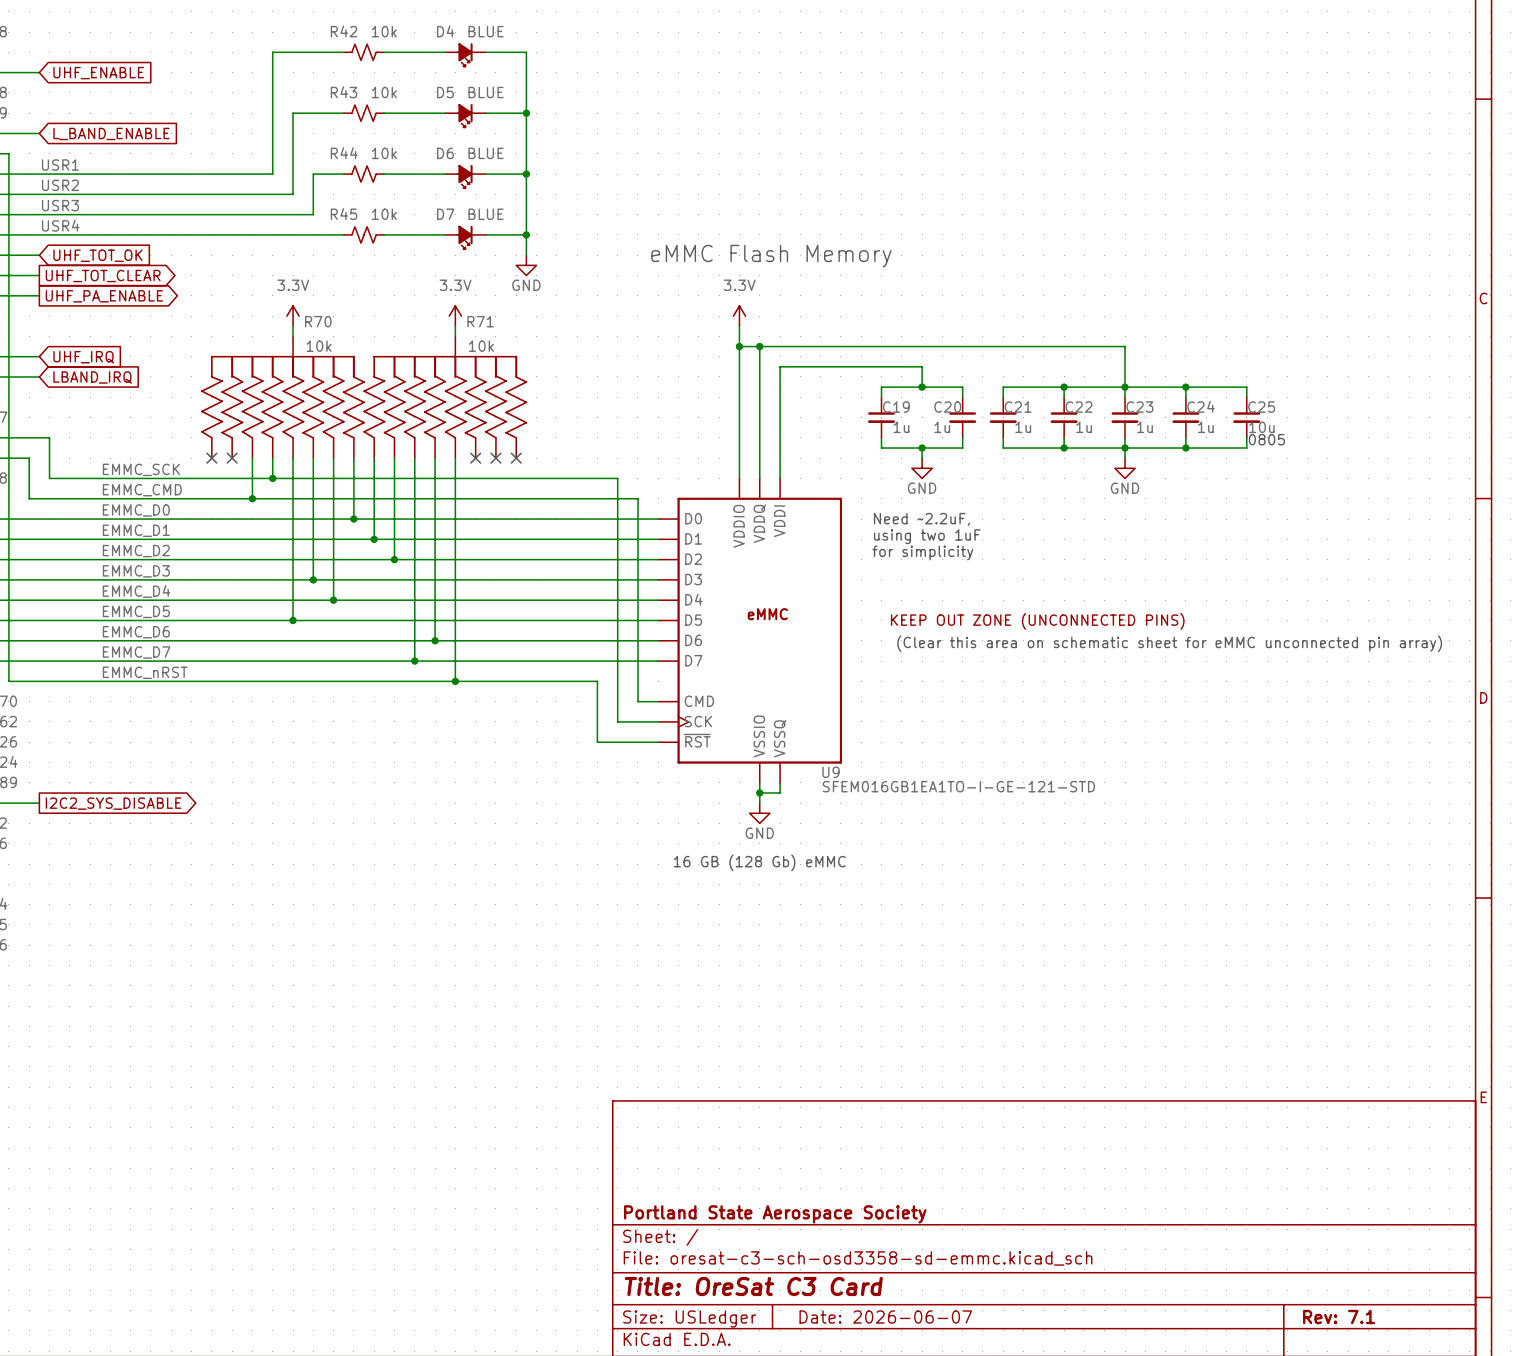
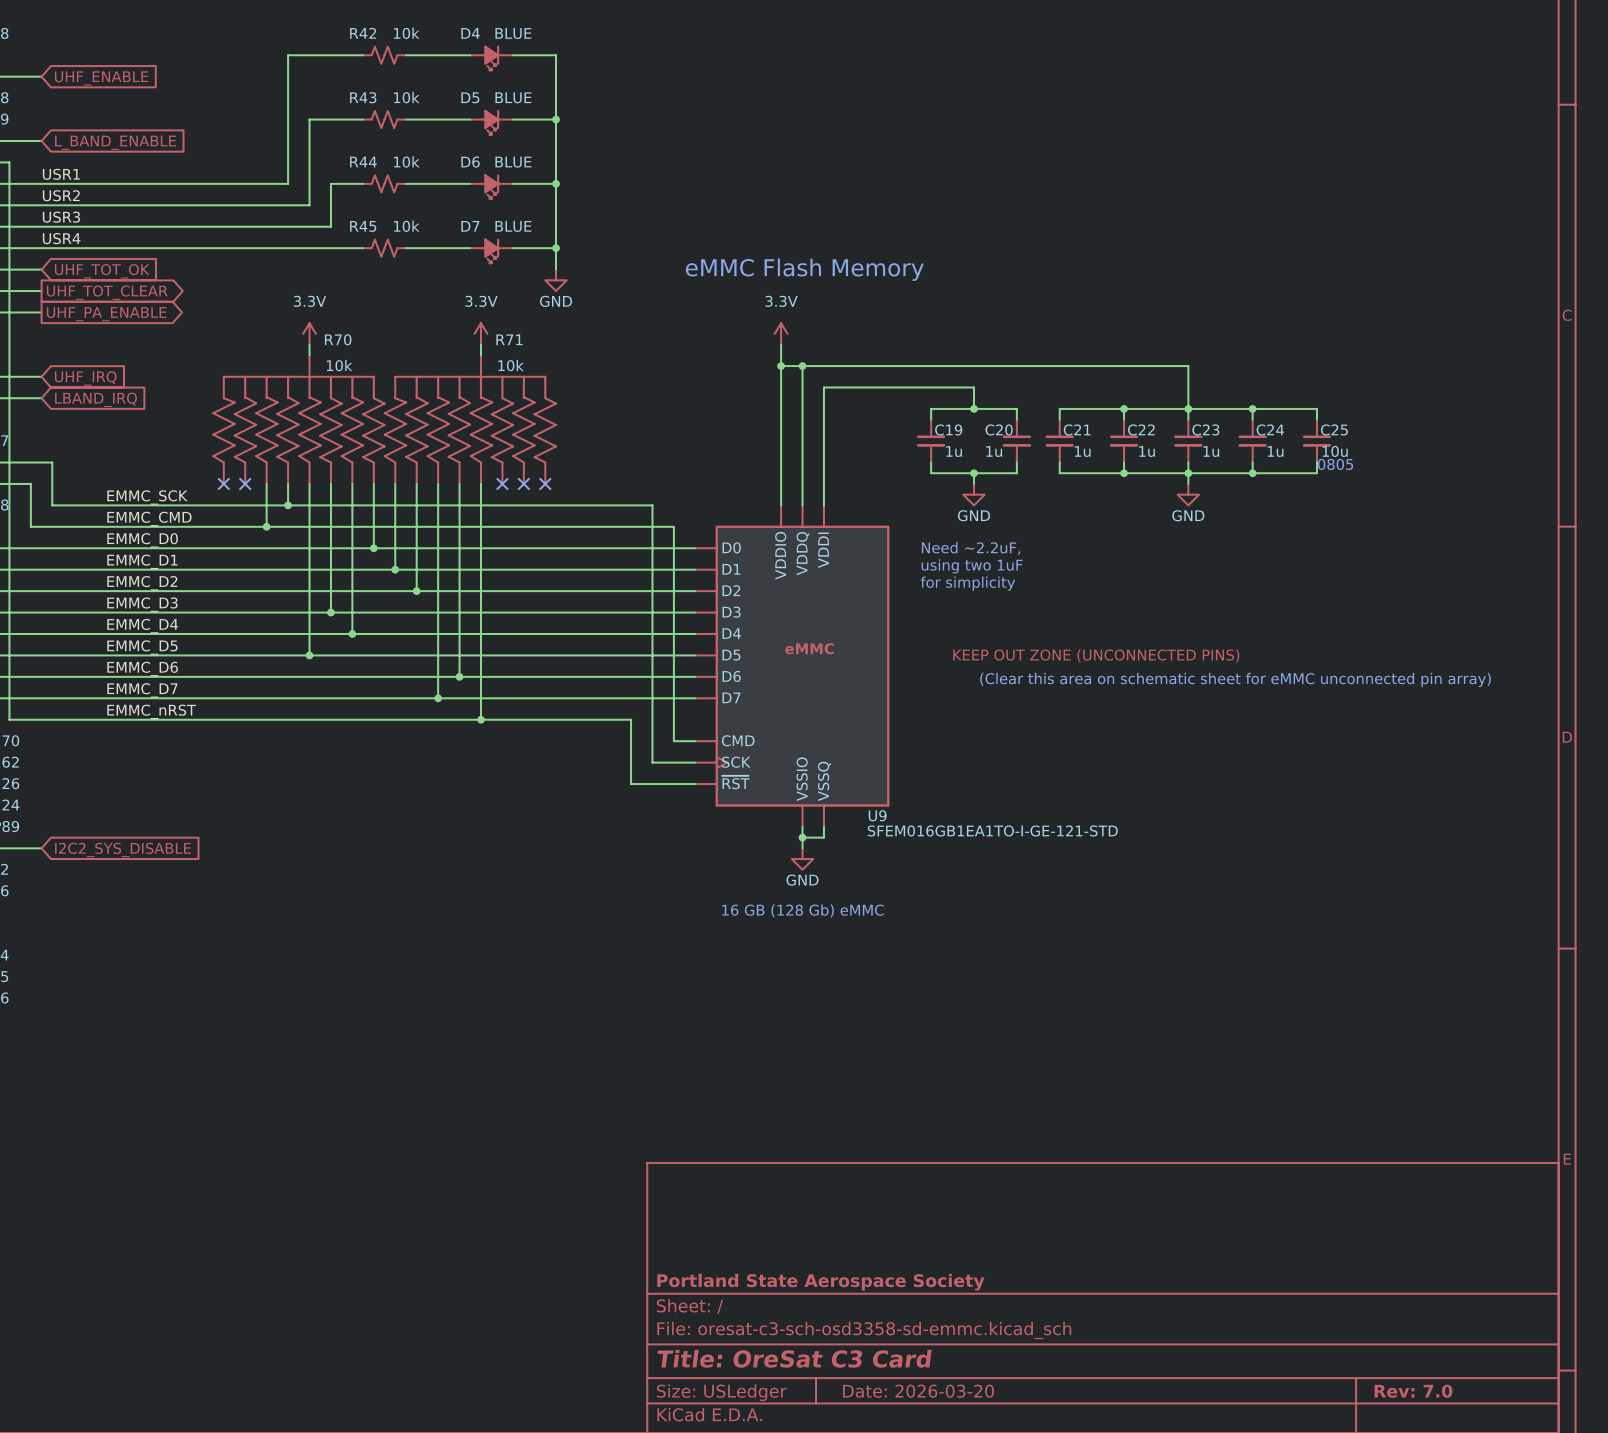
global label shape: output (113, 803) -> input (123, 849)
title block: Date: 2026-06-07 (885, 1317) -> Date: 2026-03-20 (918, 1391)
title block: Rev: 7.1 (1339, 1317) -> Rev: 7.0 (1413, 1391)

